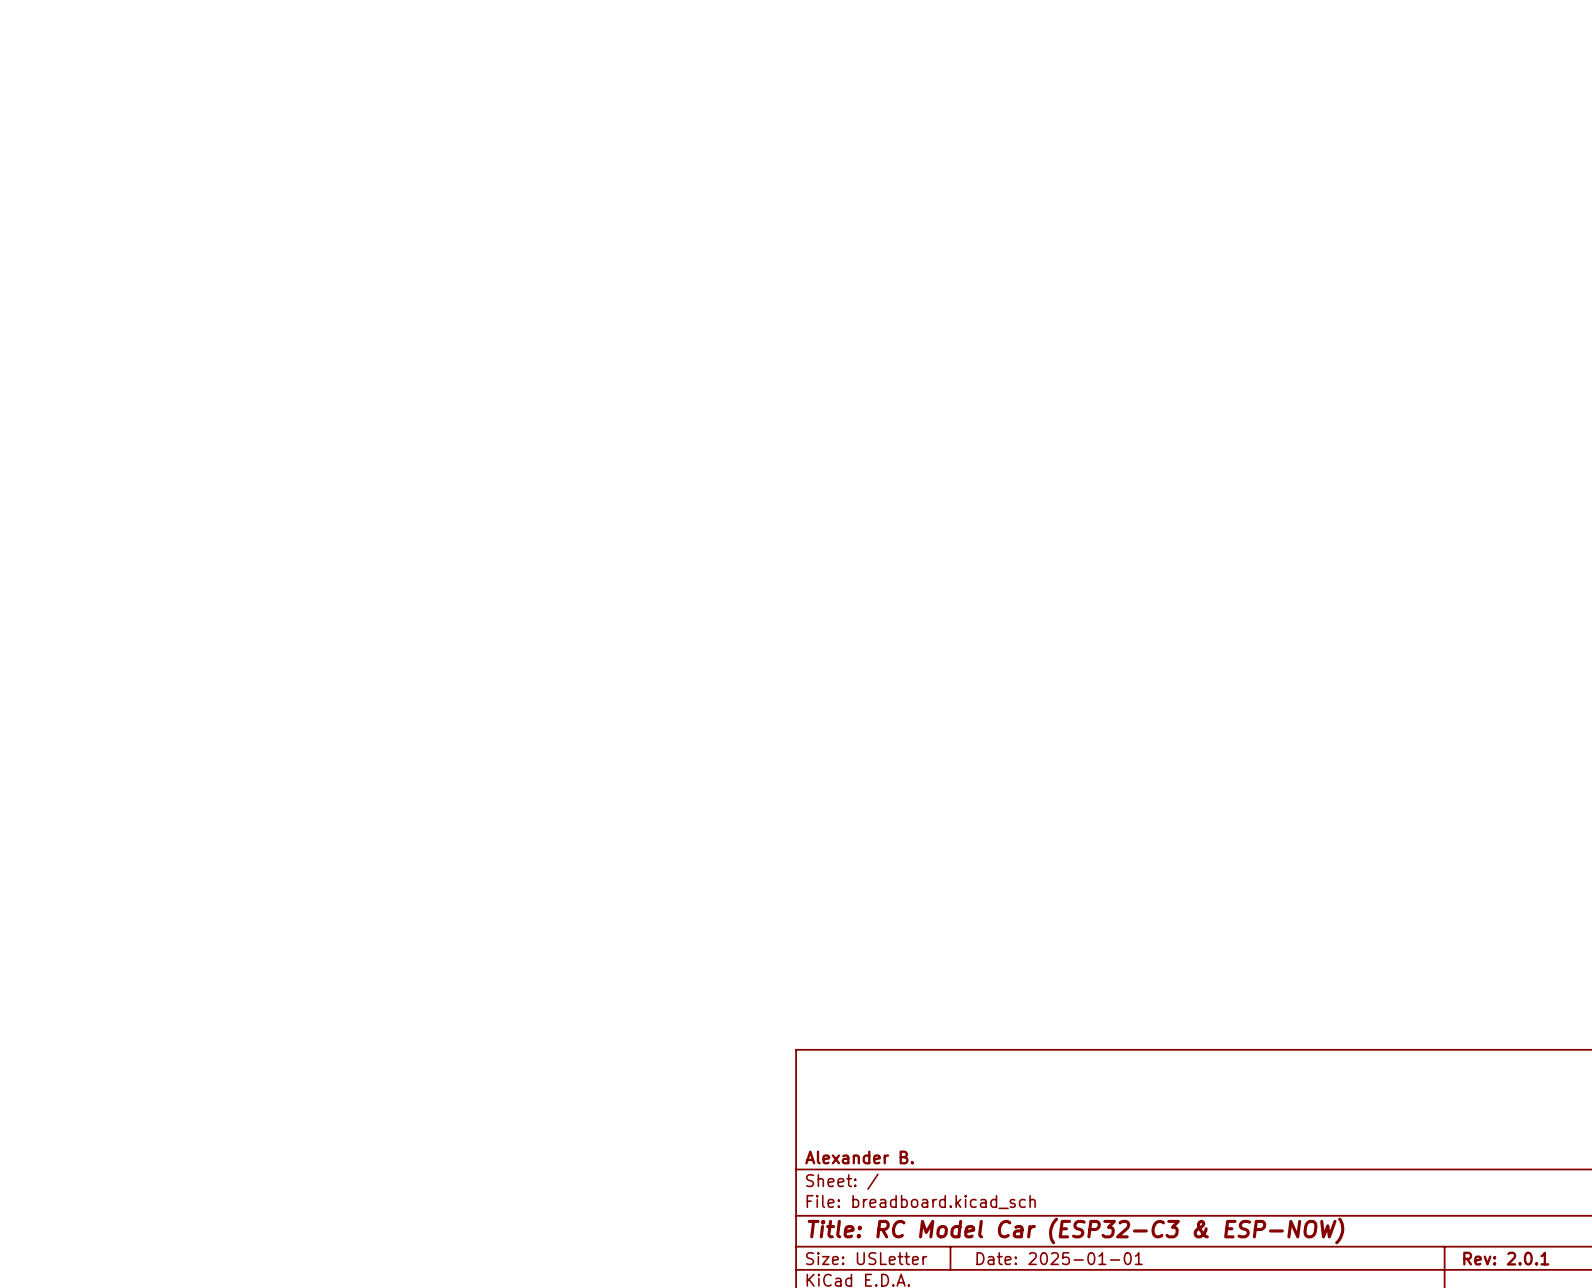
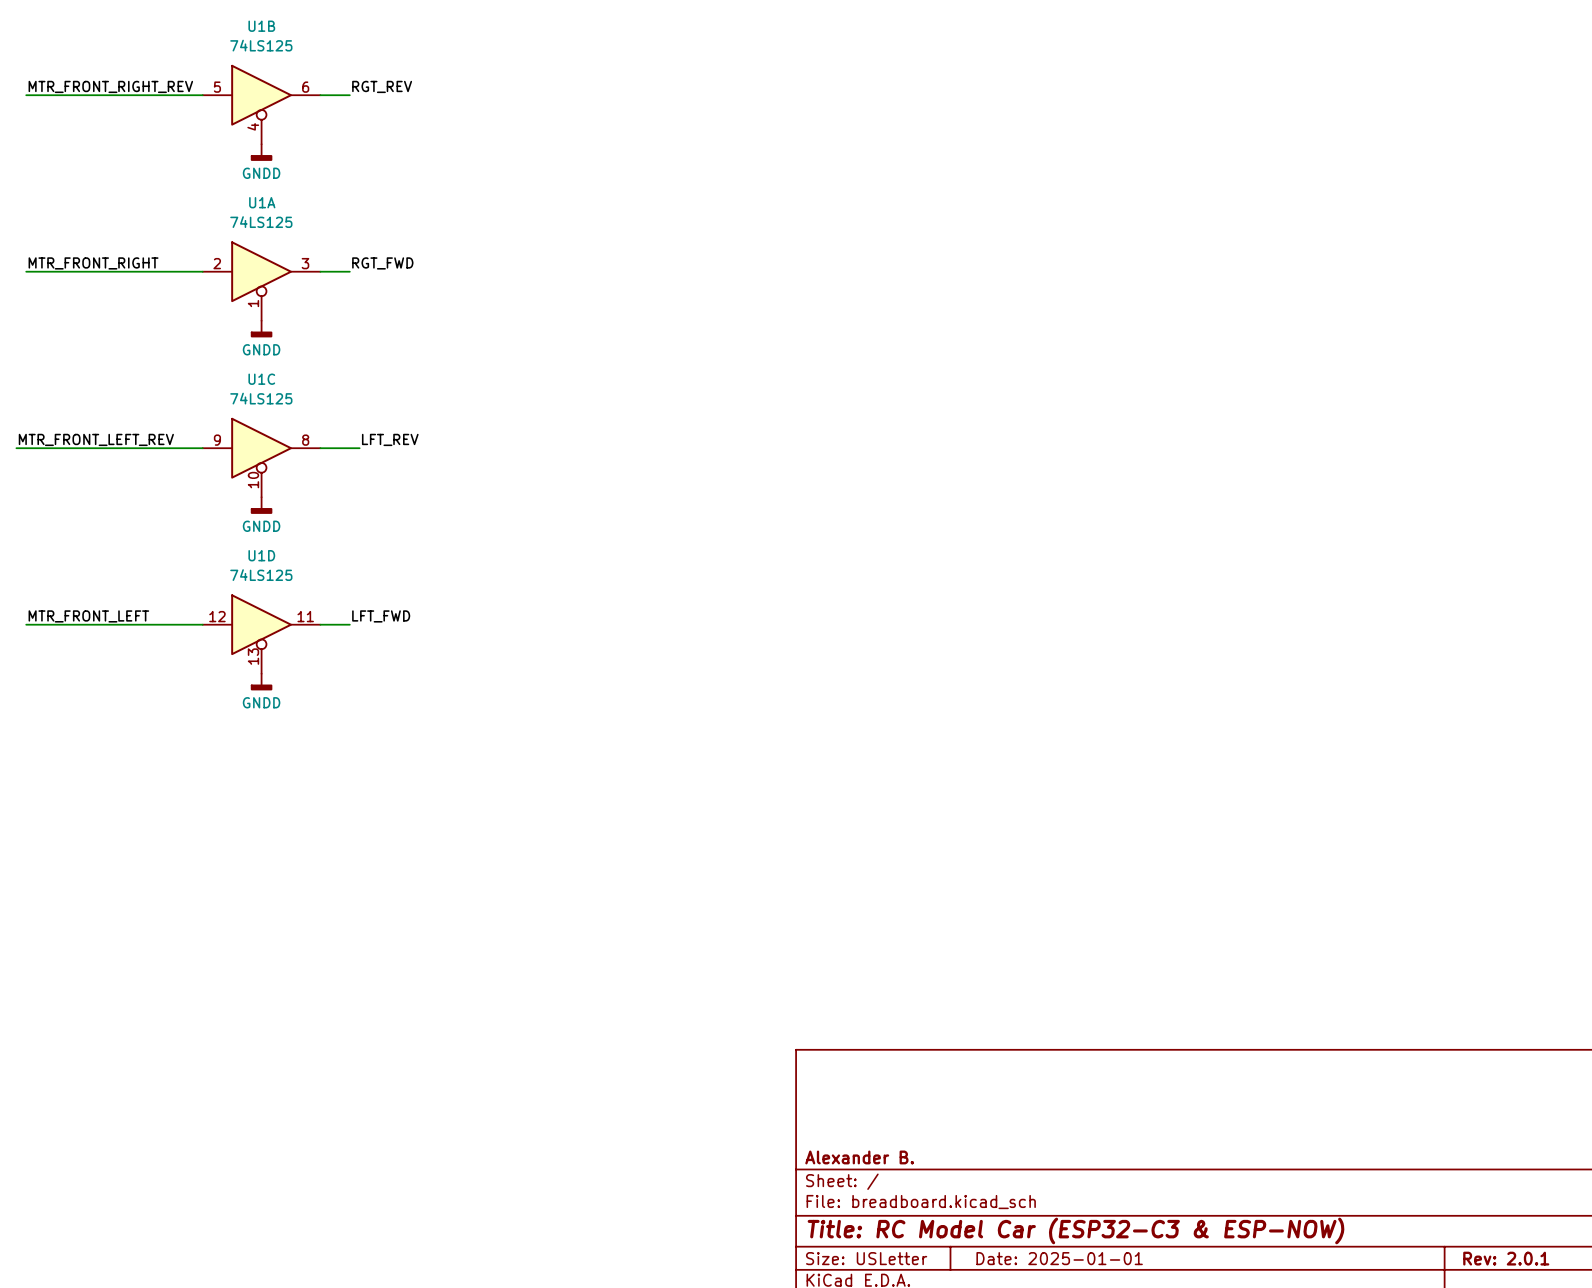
label: none -> MTR_FRONT_RIGHT_REV (110, 86)
label: none -> RGT_REV (382, 86)
wire: none -> (26, 95) (202, 95)
wire: none -> (320, 95) (349, 95)
U1B: none -> 74LS125 (261, 104)
power symbol: none -> GNDD (261, 152)
label: none -> MTR_FRONT_RIGHT (93, 263)
label: none -> RGT_FWD (382, 263)
wire: none -> (26, 271) (202, 271)
wire: none -> (320, 271) (349, 271)
U1A: none -> 74LS125 (261, 281)
power symbol: none -> GNDD (261, 329)
label: none -> MTR_FRONT_LEFT_REV (96, 439)
label: none -> LFT_REV (390, 439)
wire: none -> (16, 448) (202, 448)
wire: none -> (320, 448) (359, 448)
U1C: none -> 74LS125 (261, 457)
power symbol: none -> GNDD (261, 505)
label: none -> MTR_FRONT_LEFT (88, 616)
label: none -> LFT_FWD (381, 616)
wire: none -> (26, 624) (202, 624)
wire: none -> (320, 624) (349, 624)
U1D: none -> 74LS125 (261, 634)
power symbol: none -> GNDD (261, 682)

